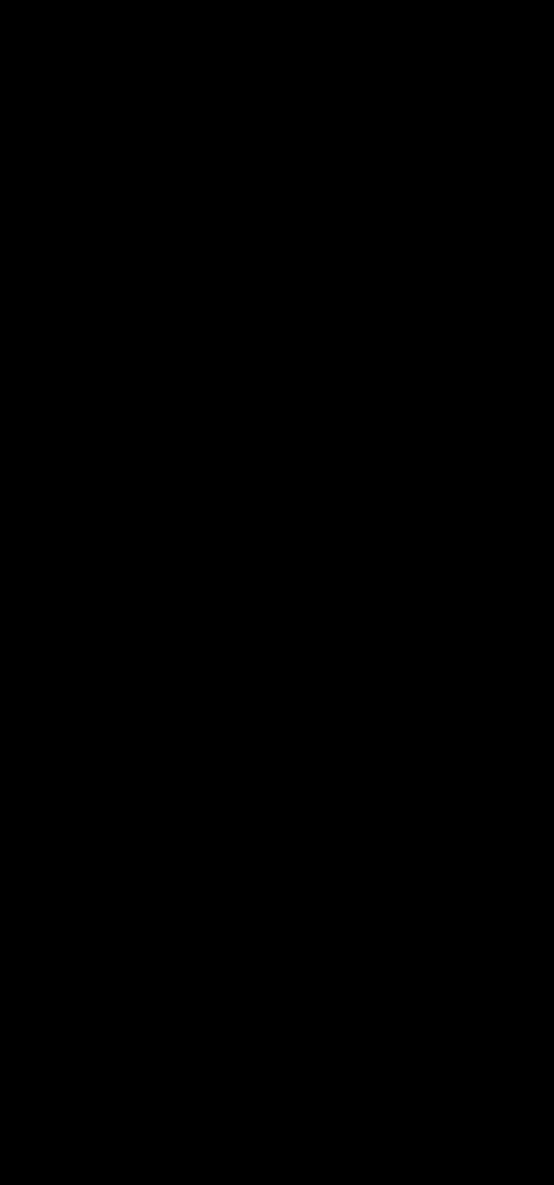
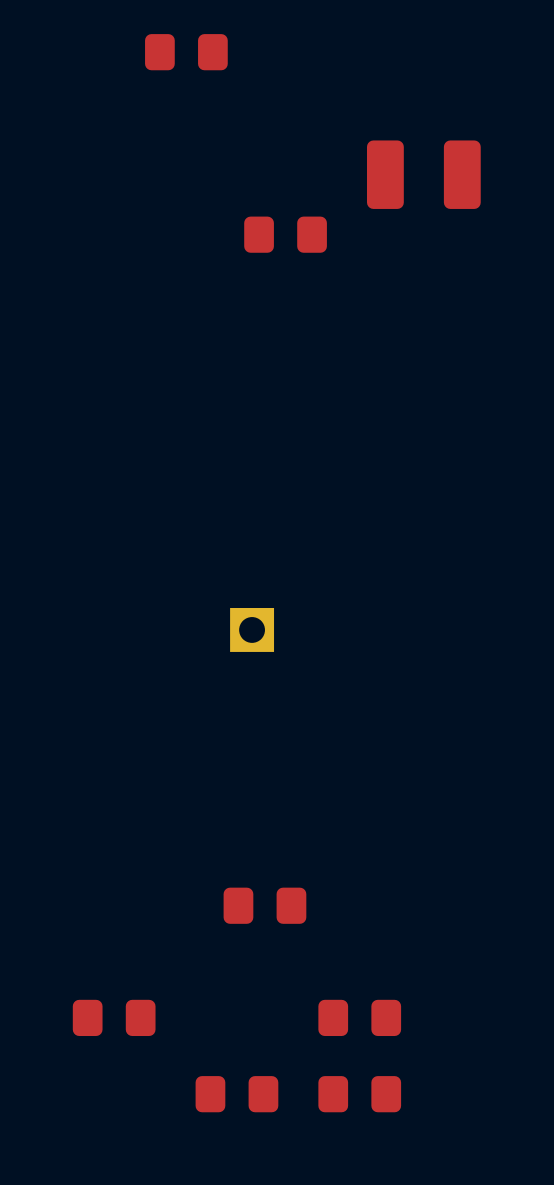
part: none -> (186, 52)
part: none -> (423, 174)
part: none -> (285, 234)
part: none -> (252, 629)
part: none -> (264, 905)
part: none -> (114, 1017)
part: none -> (359, 1017)
part: none -> (236, 1094)
part: none -> (359, 1094)

